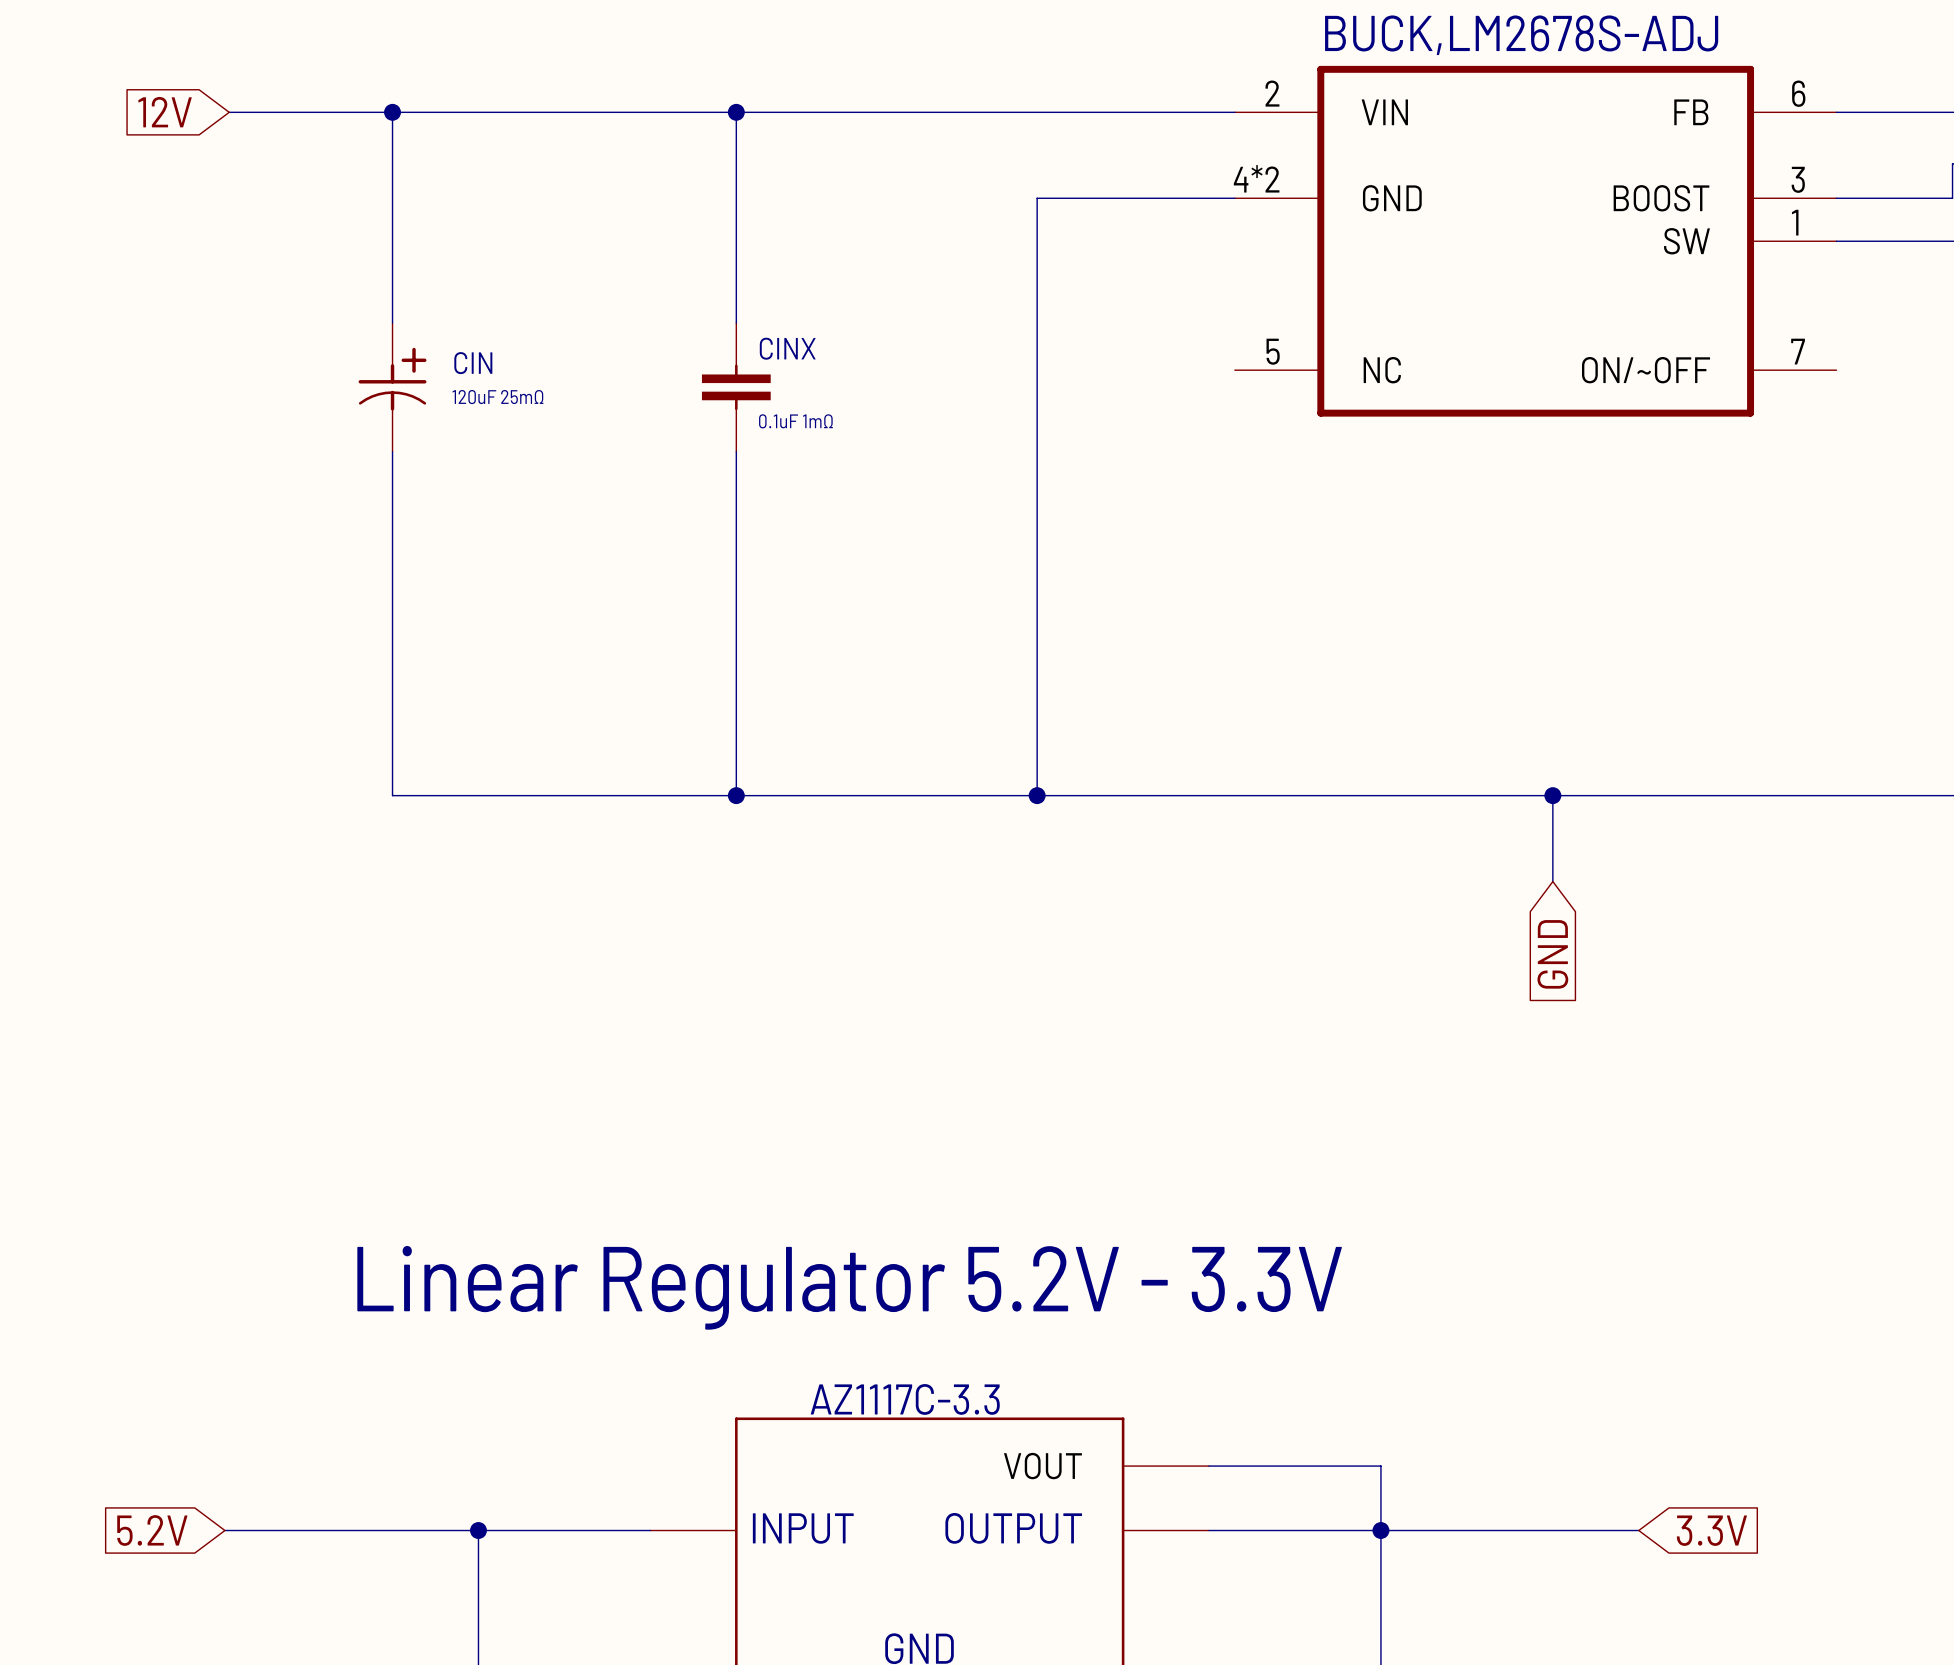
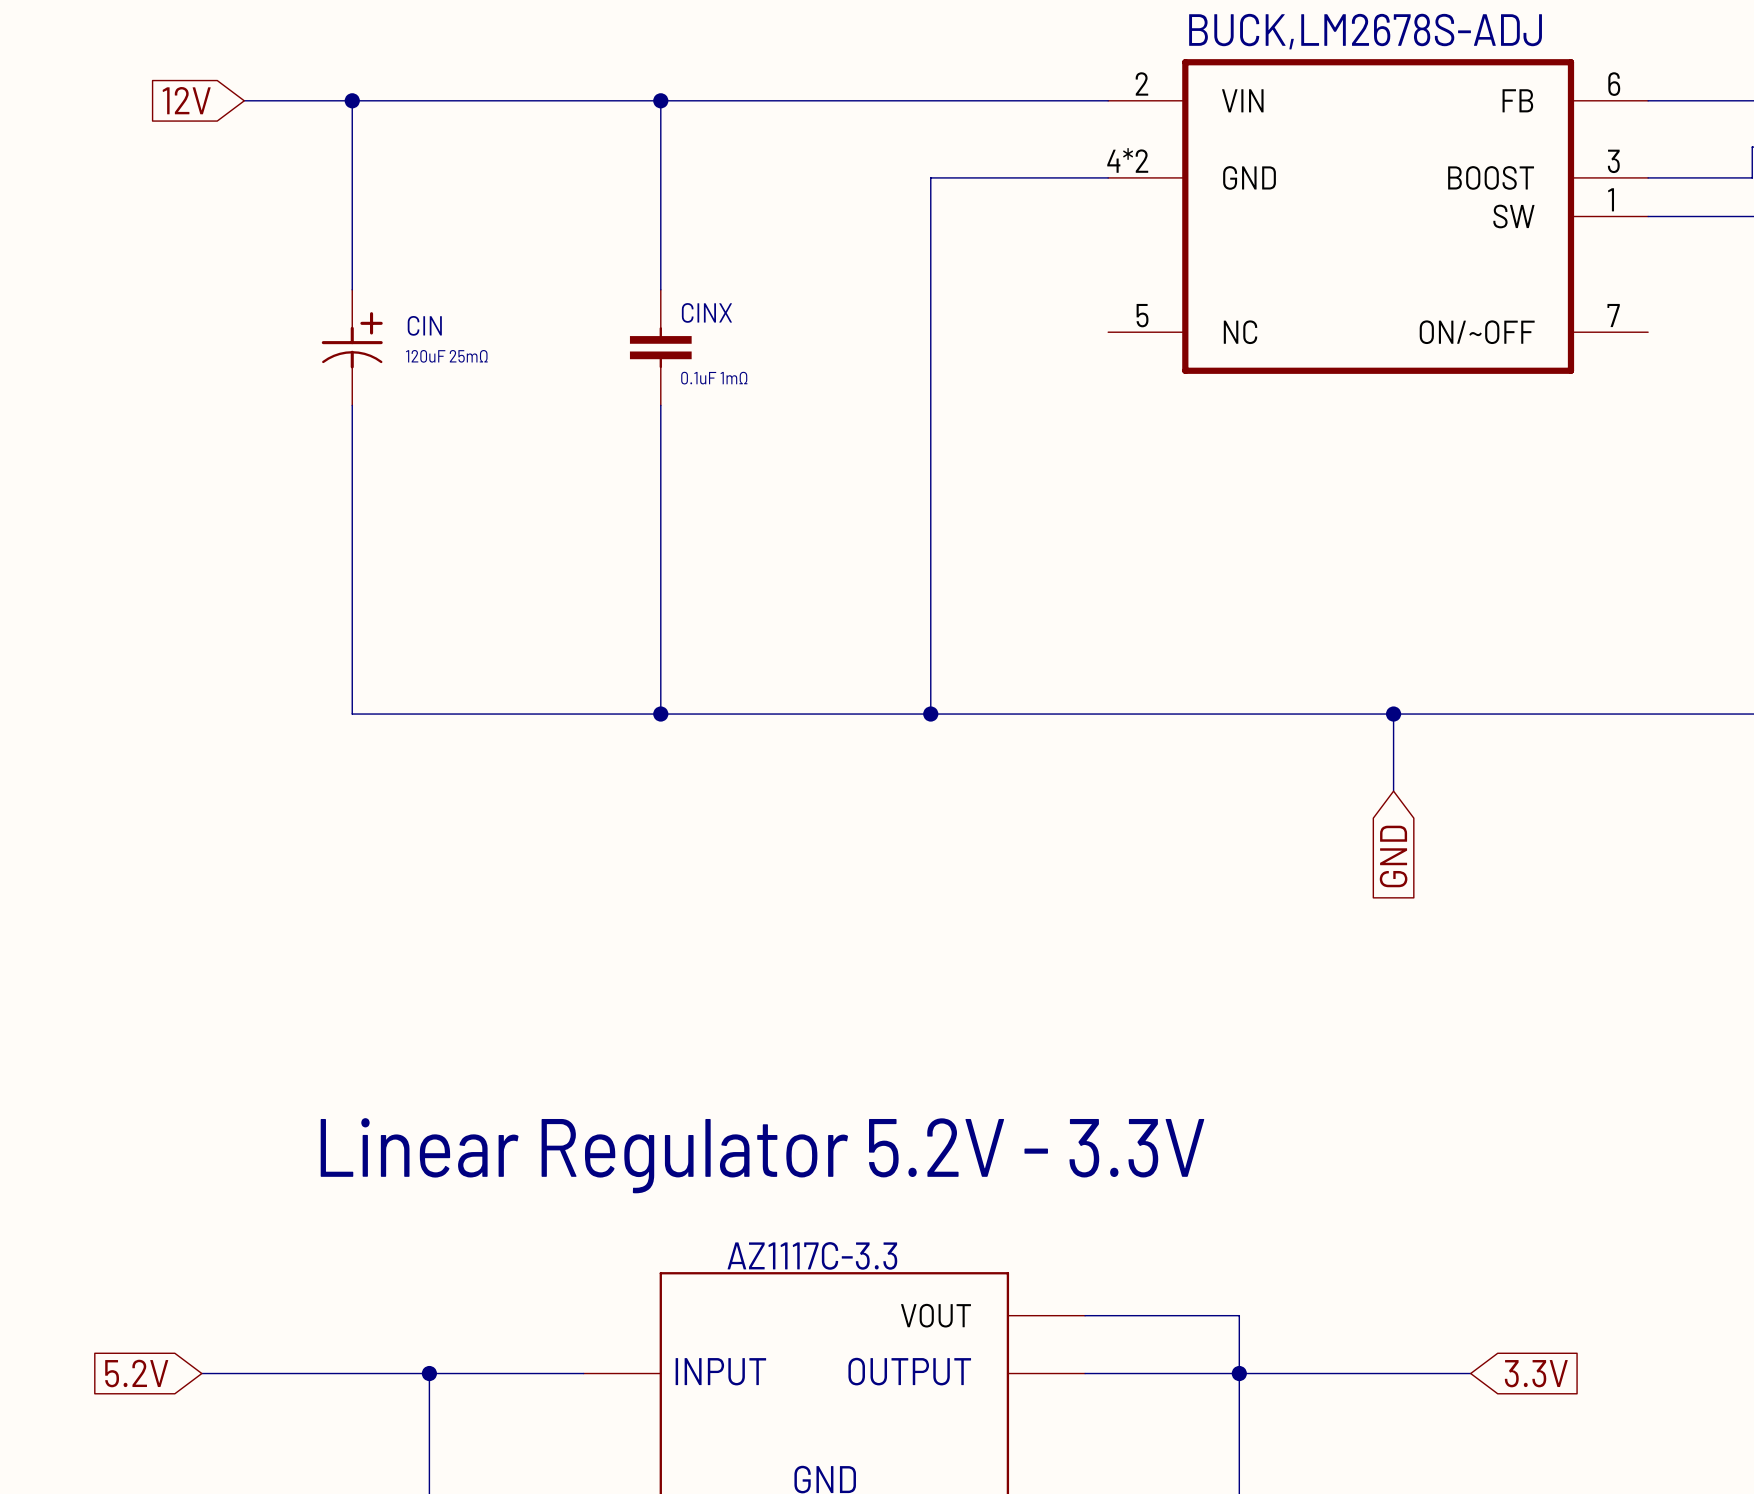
global label position: 12V (165, 112) -> 12V (186, 100)
wire: (229, 112) (272, 112) -> none

